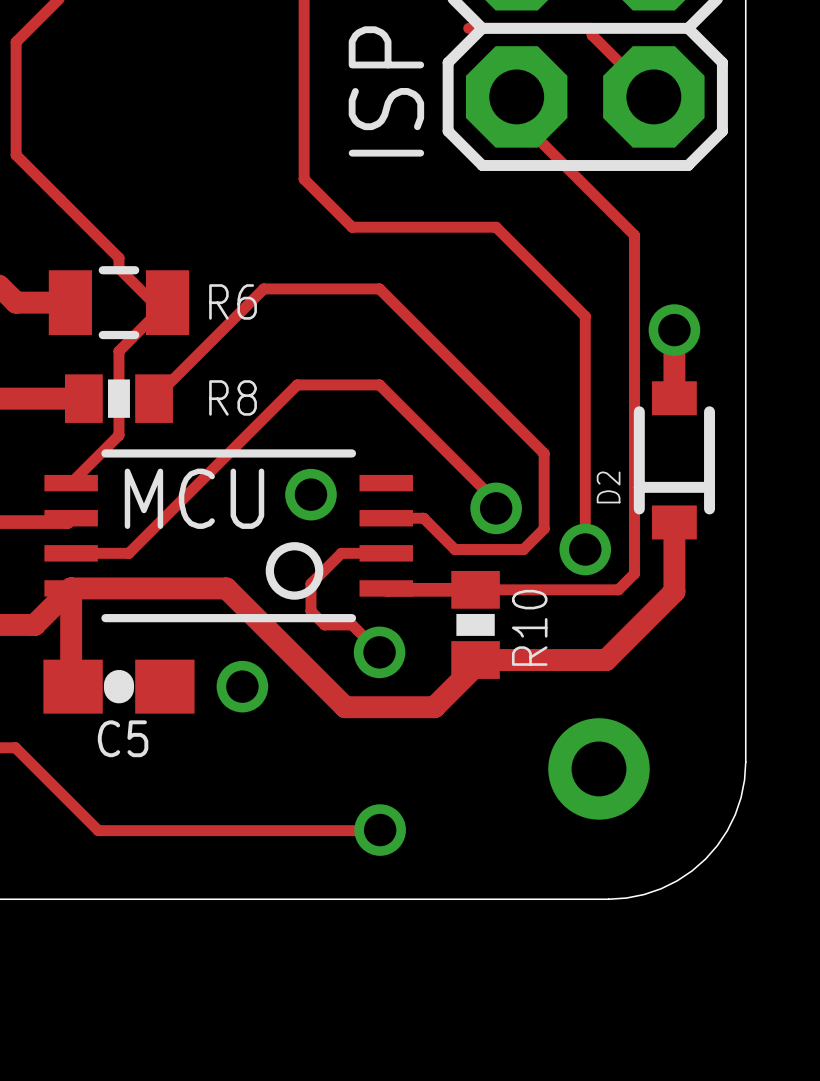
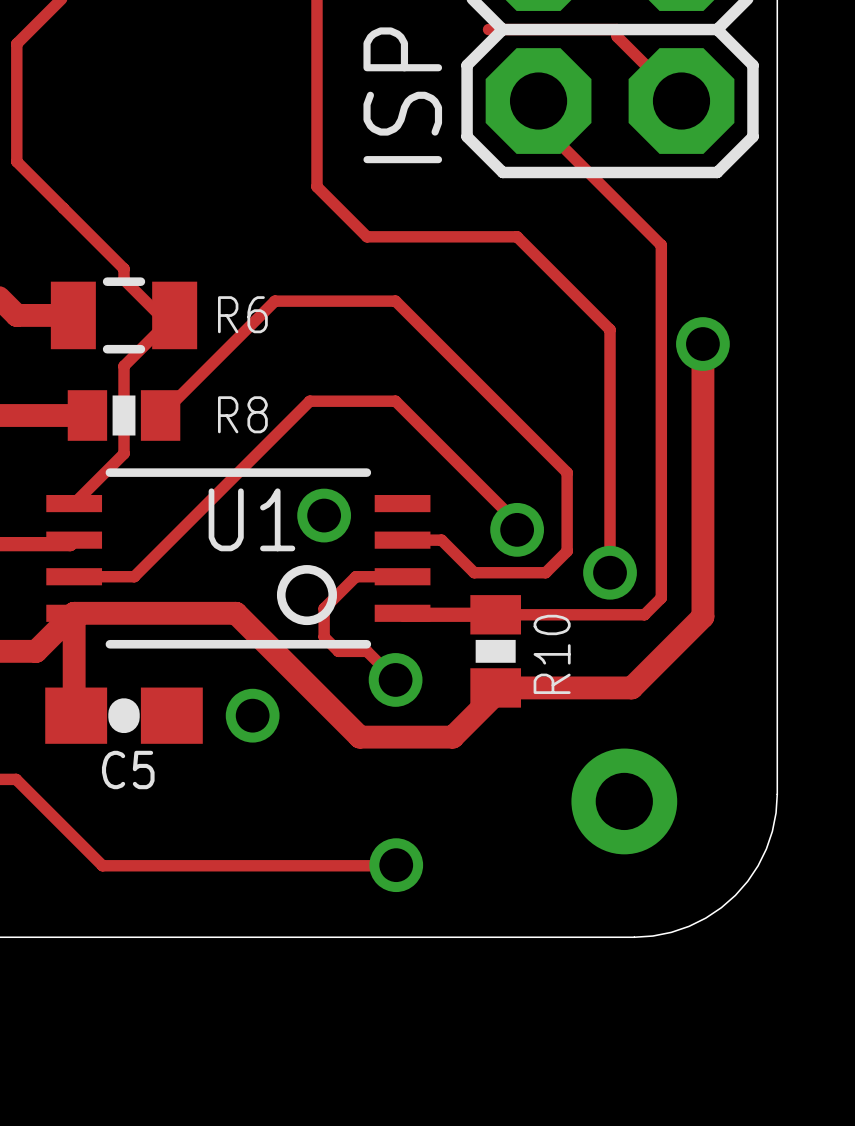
track: none -> (702, 415) (702, 544)
D2: (674, 460) -> none
MCU name: MCU (194, 498) -> U1 (251, 519)

